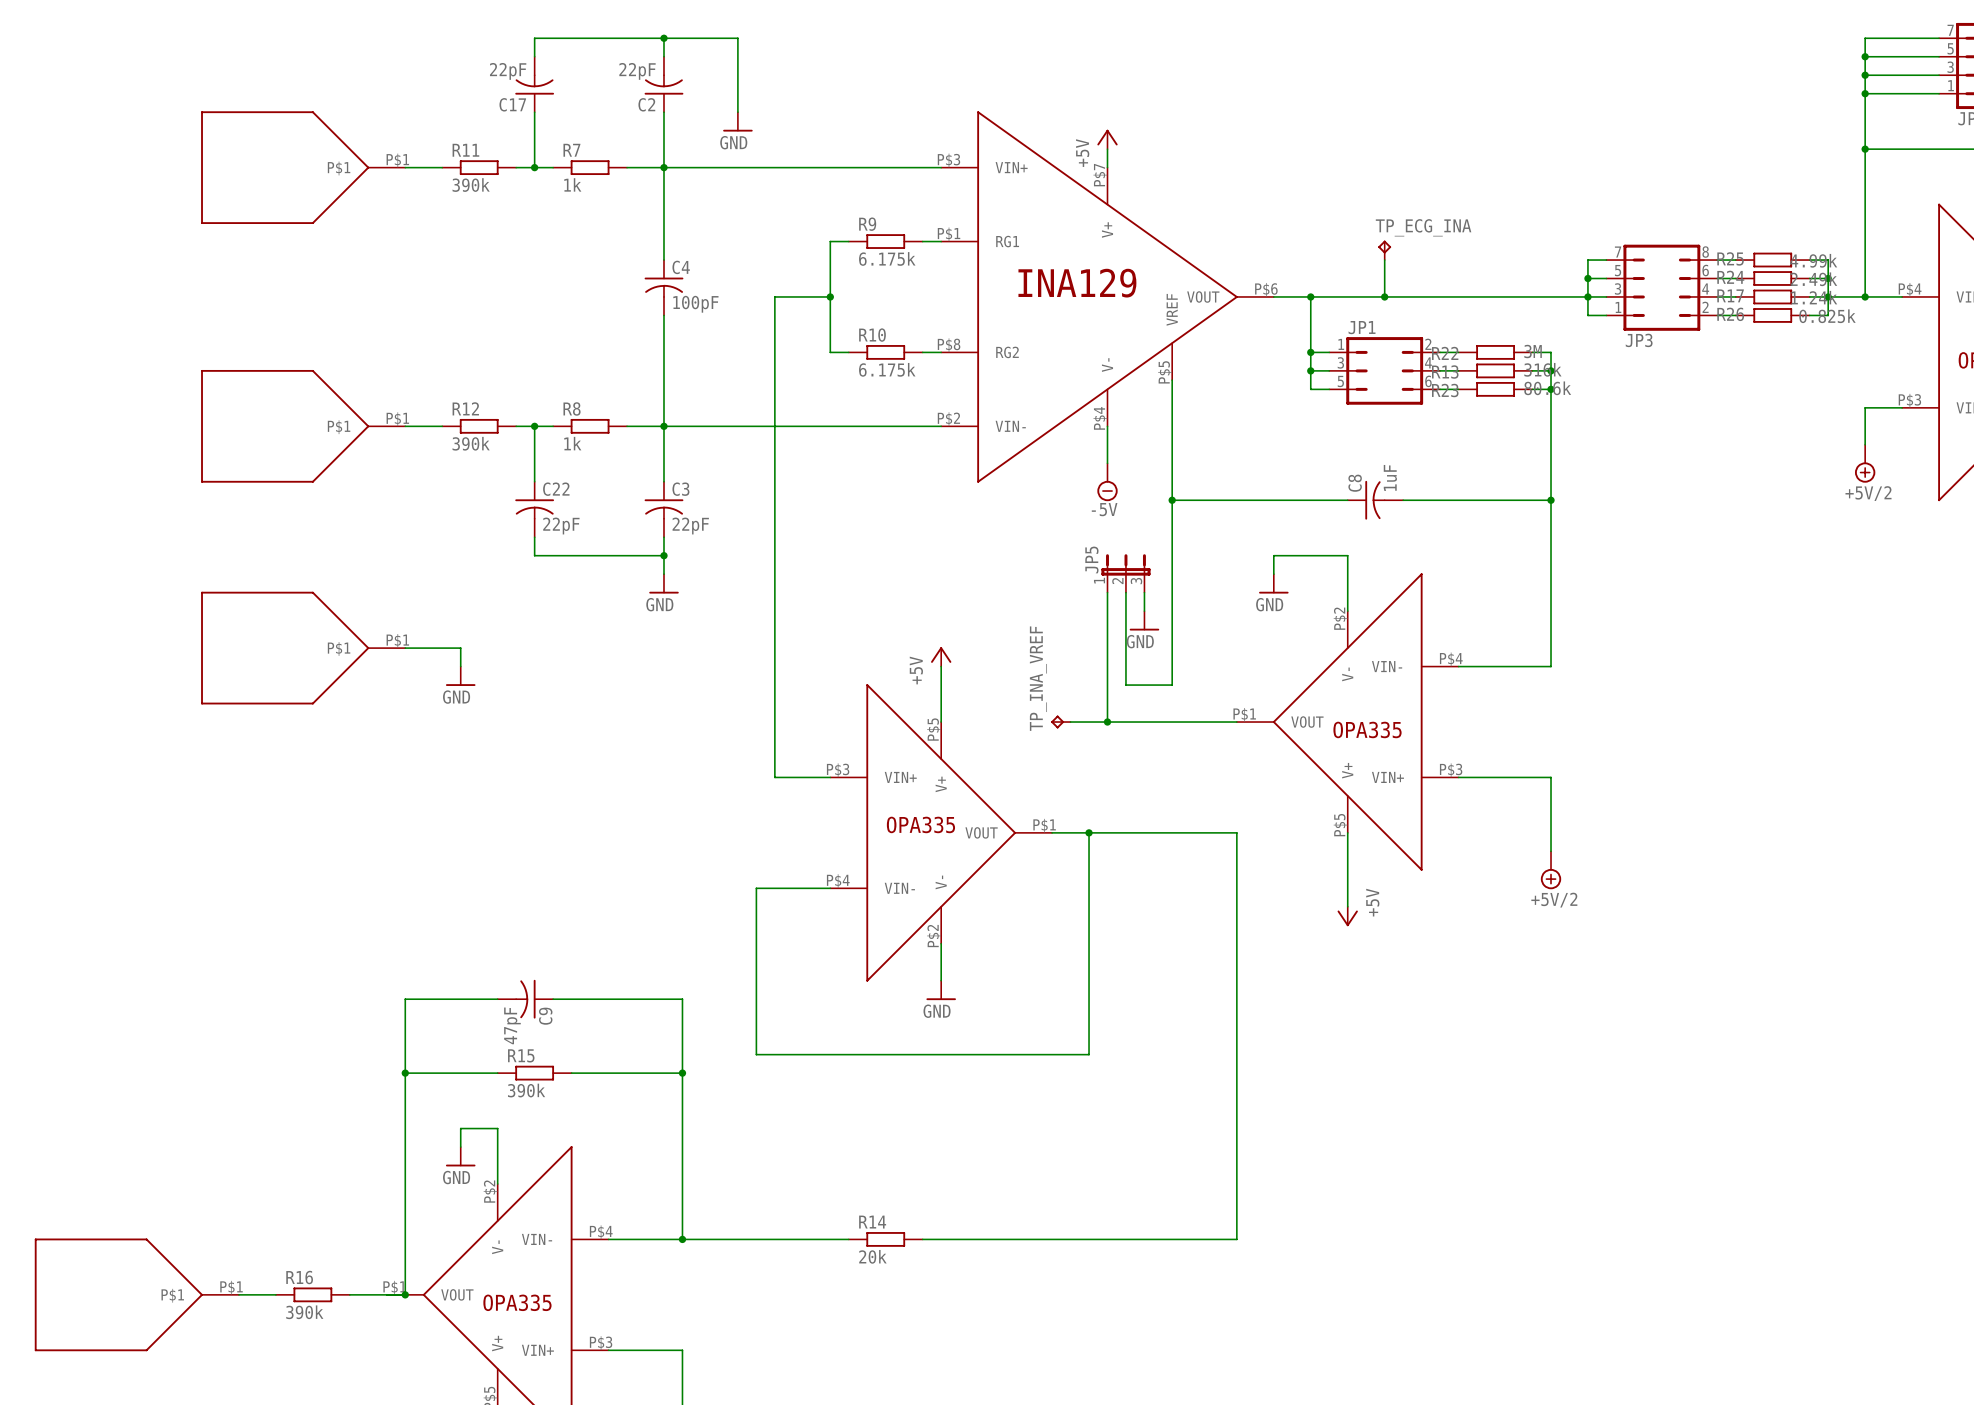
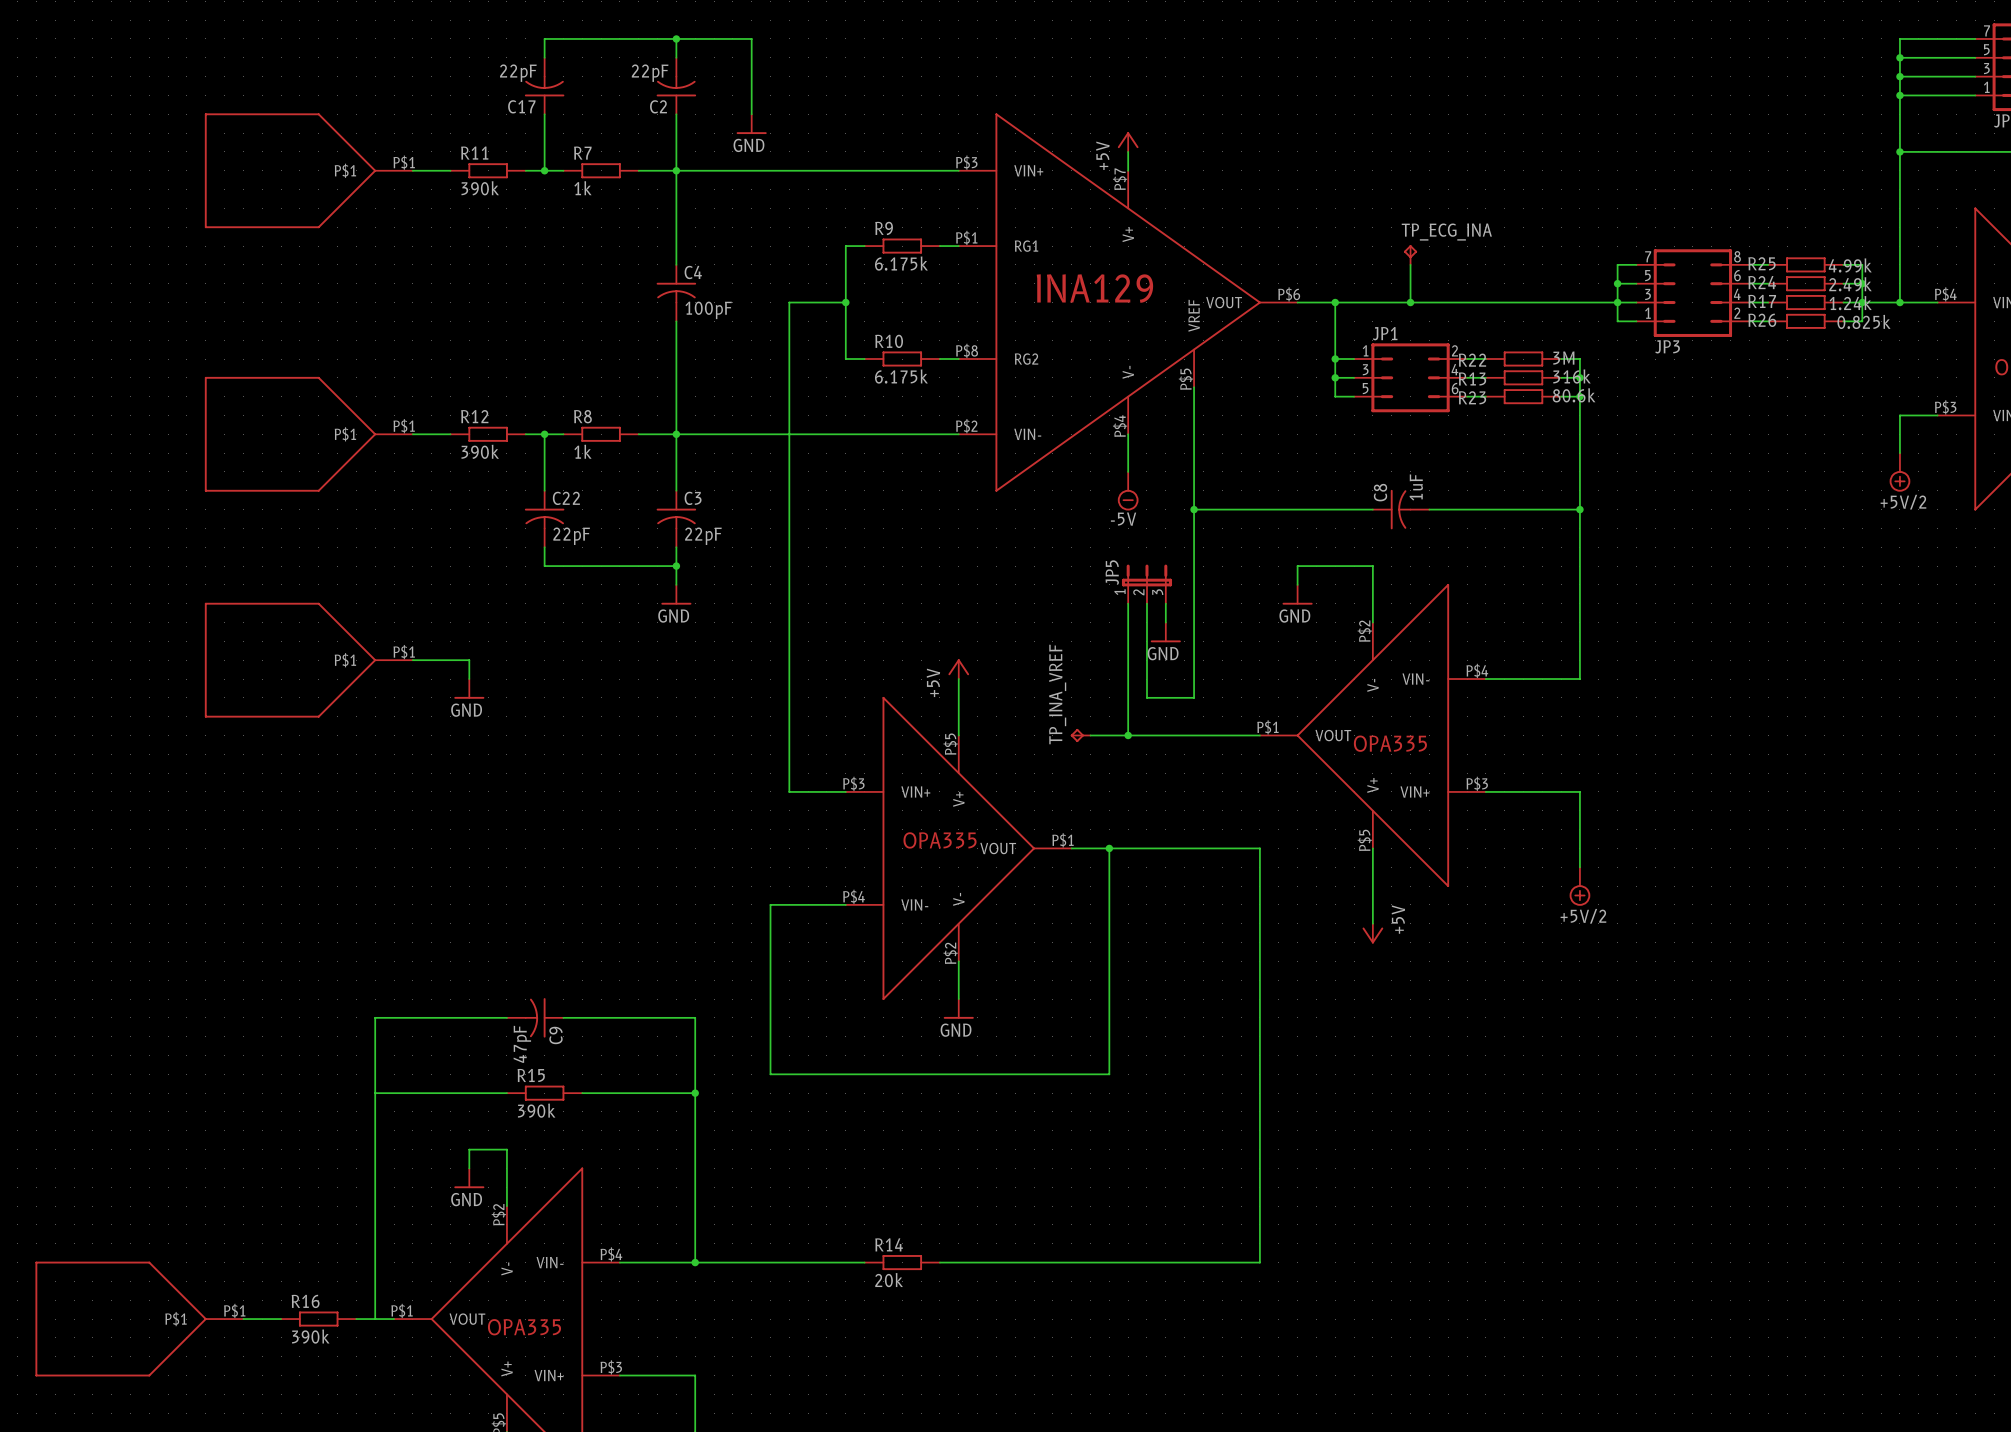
wire: (405, 999) (405, 1294) (386, 1294) -> (412, 1017) (375, 1017) (375, 1319)
wire: none -> (375, 1093) (412, 1093)
junction: (405, 1073) -> none
junction: (405, 1294) -> none

